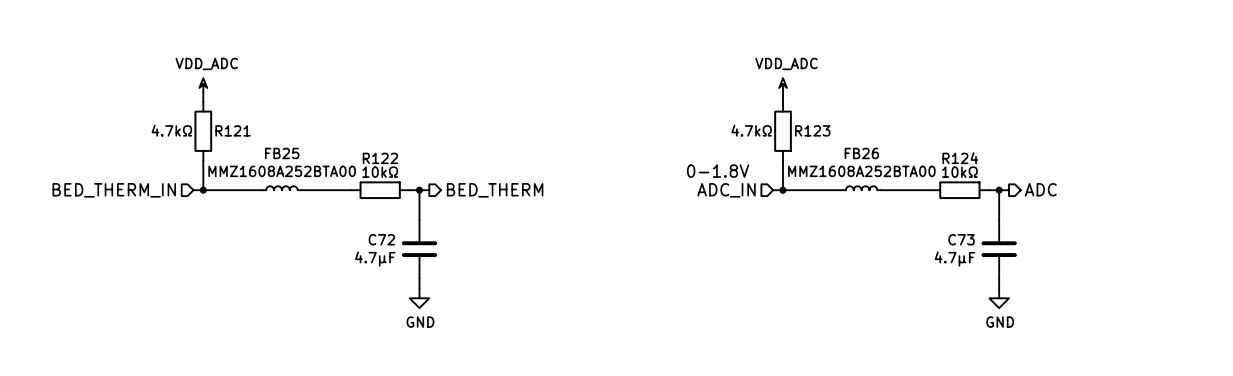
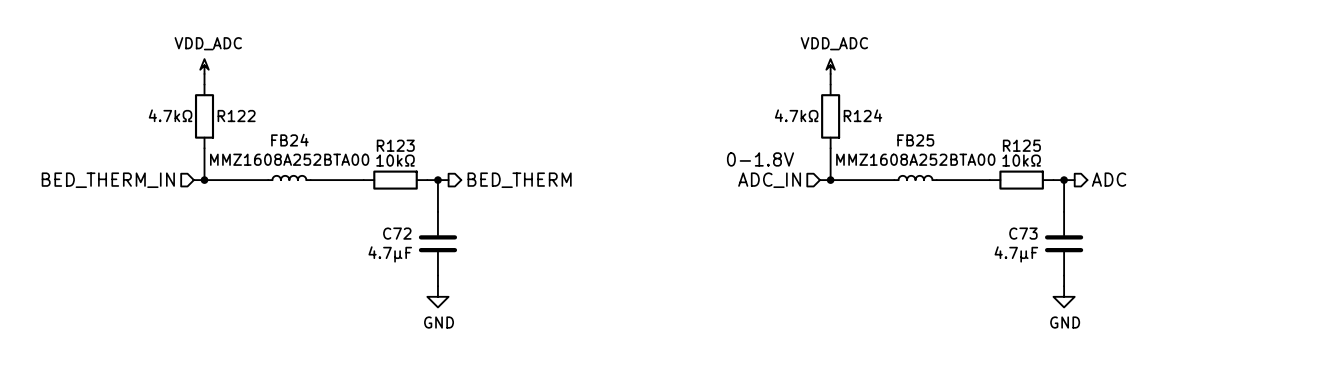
R121 name: R121 (233, 130) -> R122 (236, 116)
R123 name: R123 (812, 130) -> R124 (862, 115)
FB25 name: FB25 (282, 153) -> FB24 (289, 140)
FB26 name: FB26 (861, 153) -> FB25 (915, 140)
R122 name: R122 (380, 158) -> R123 (395, 145)
R124 name: R124 (960, 158) -> R125 (1021, 145)

